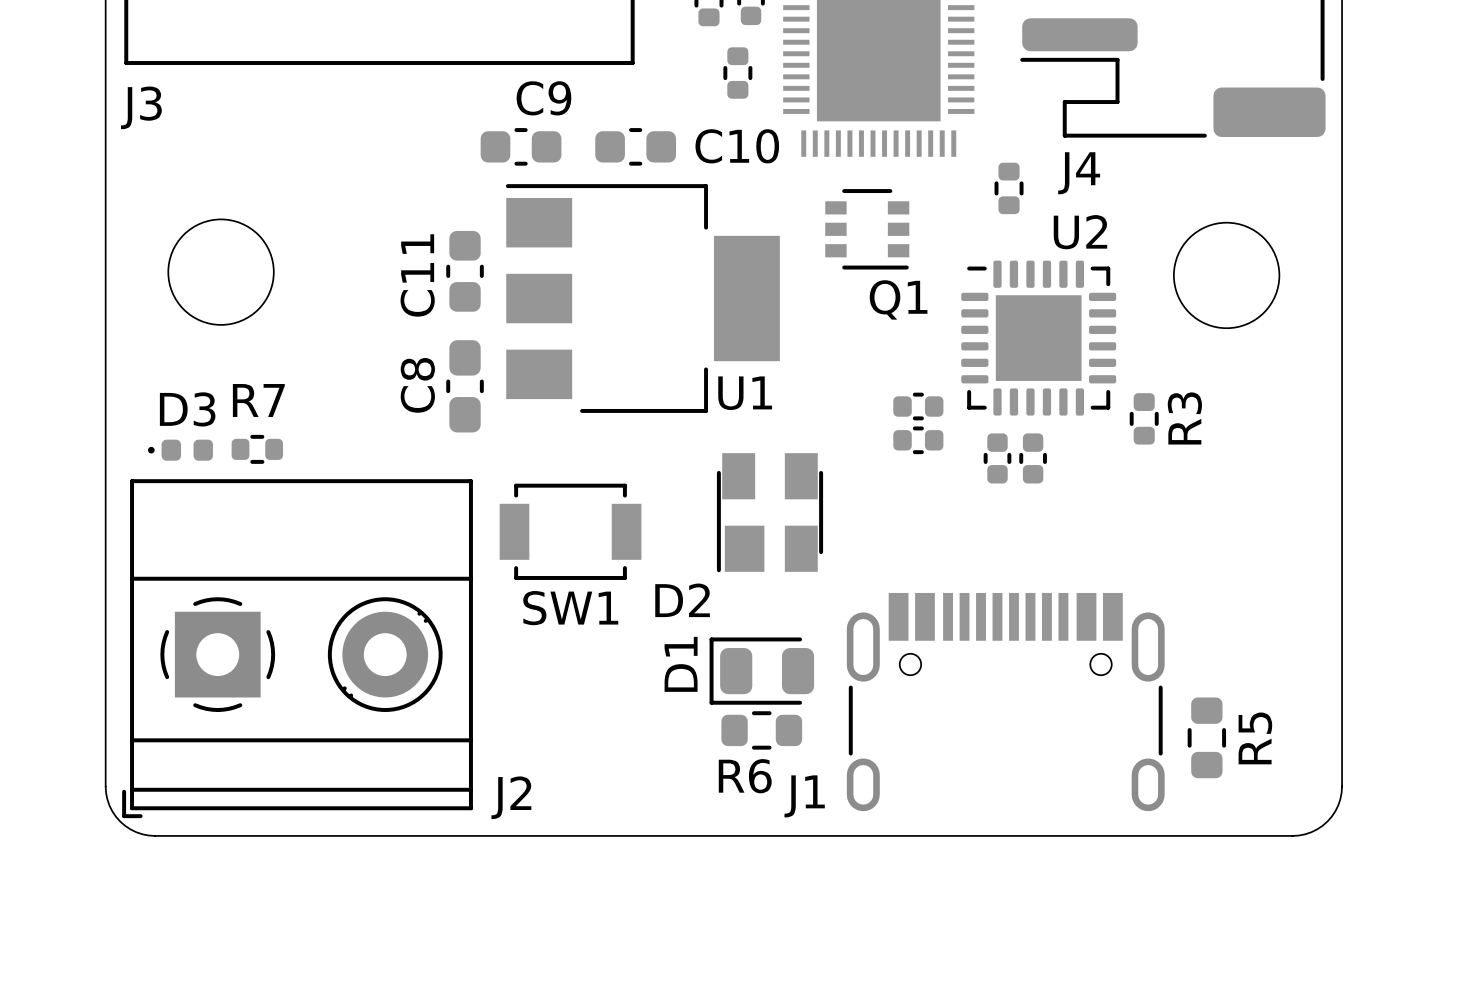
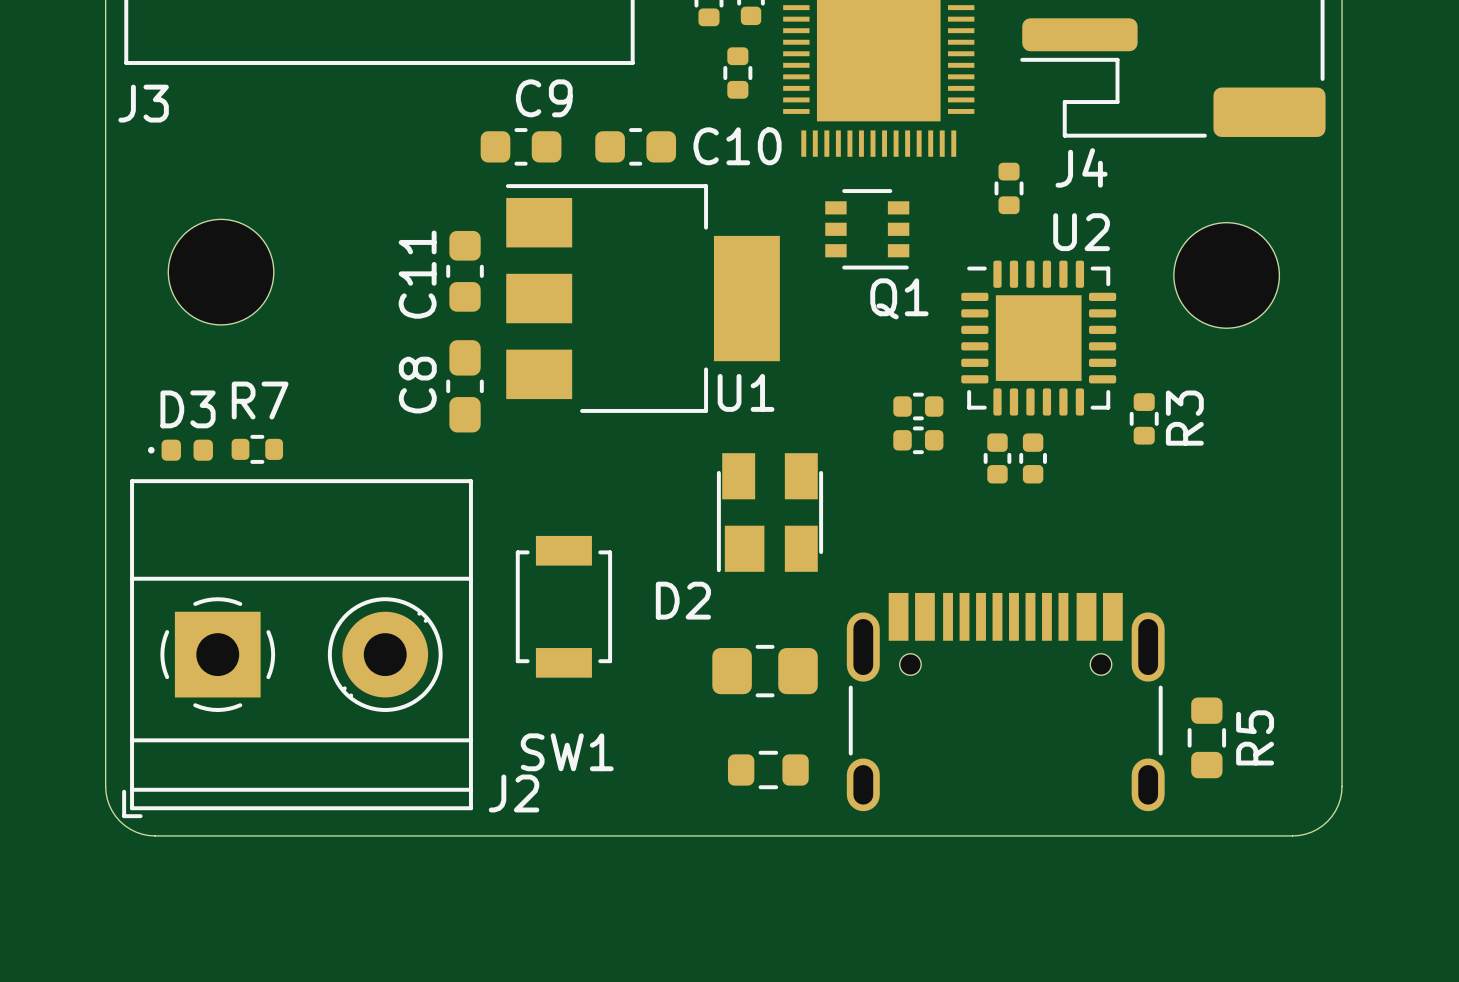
SW1 rotation: 0° (570, 531) -> 90° clockwise (563, 606)
SW1 name position: SW1 (570, 608) -> SW1 (567, 752)
D1: (761, 671) -> none
part: none -> (765, 671)
R6: (761, 730) -> none
part: none -> (768, 770)
J1 name: J1 (804, 796) -> none

